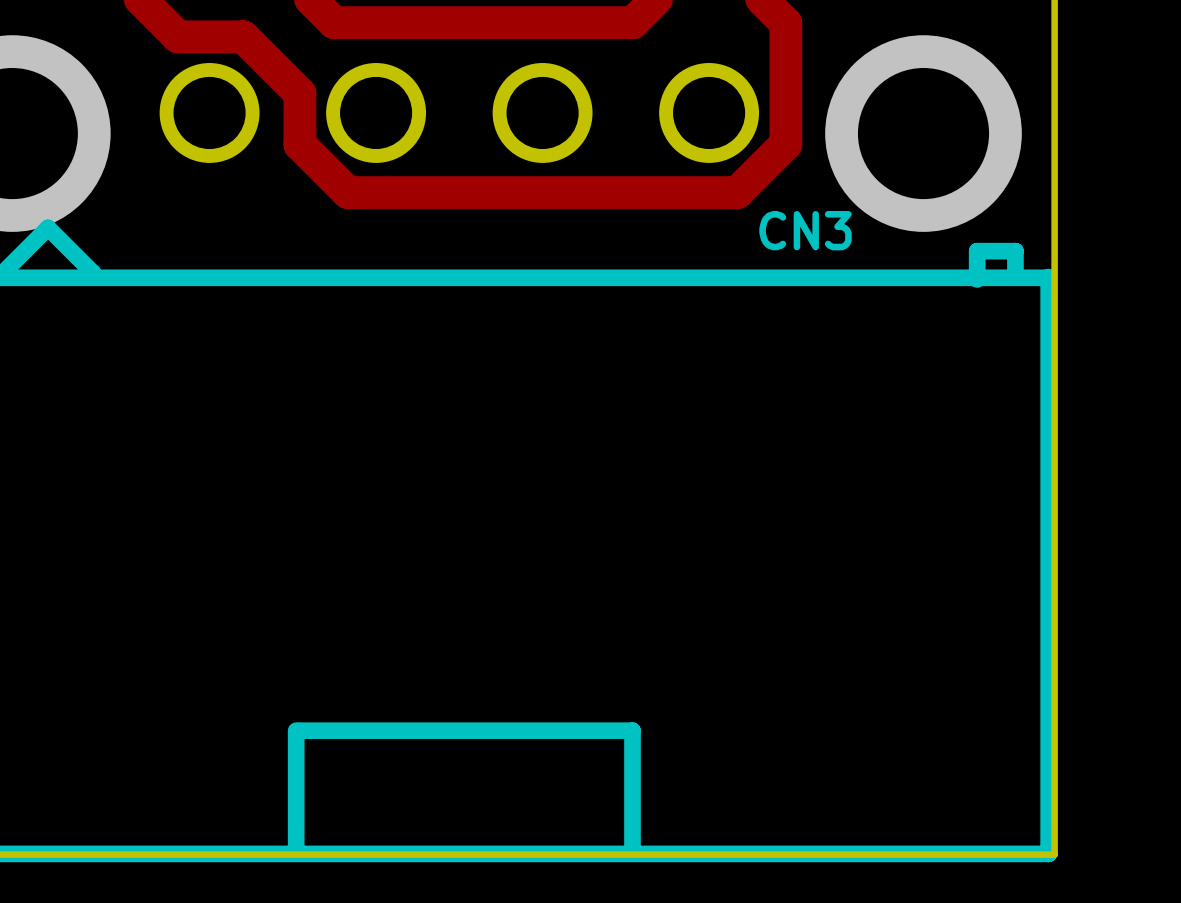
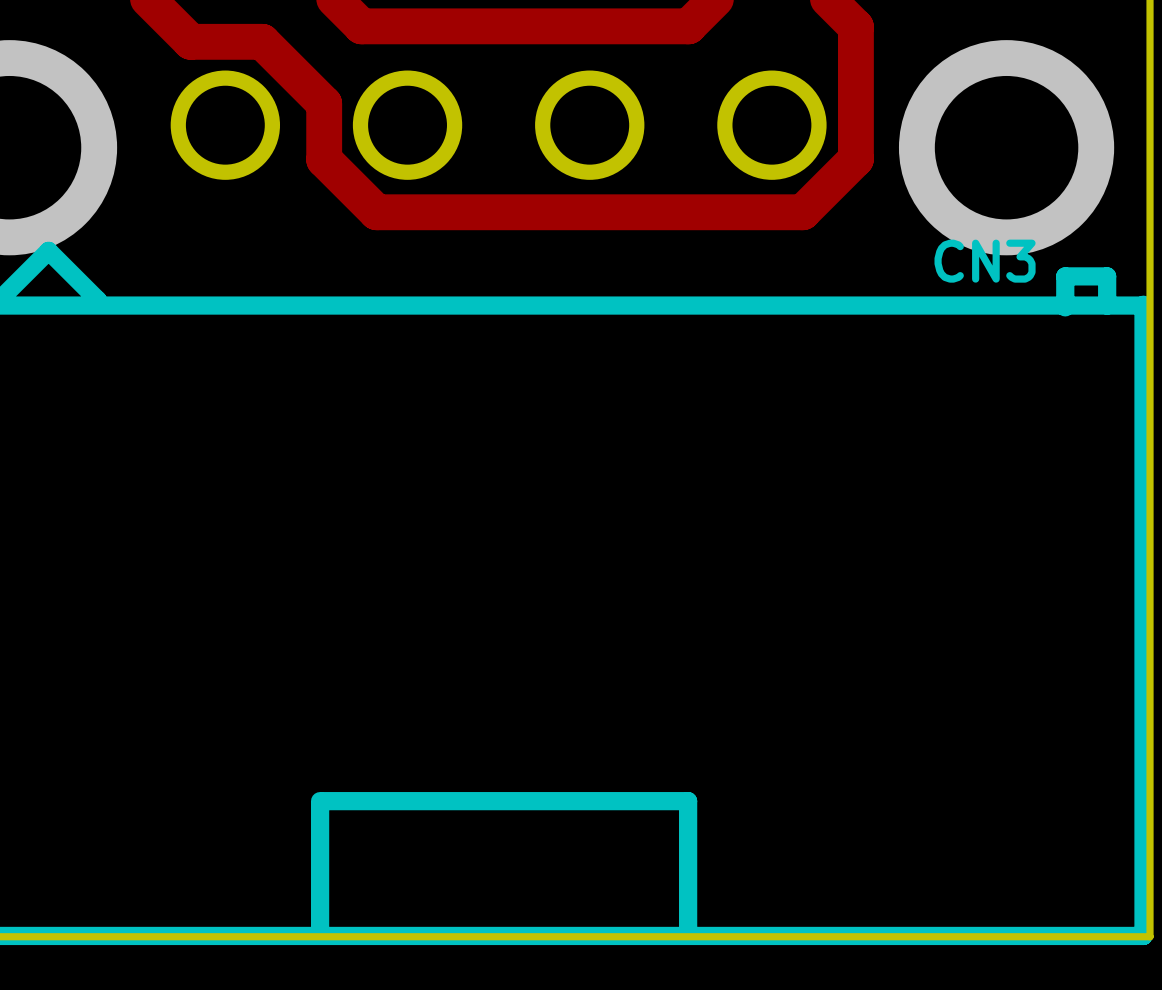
CN3 name position: CN3 (805, 230) -> CN3 (985, 261)

